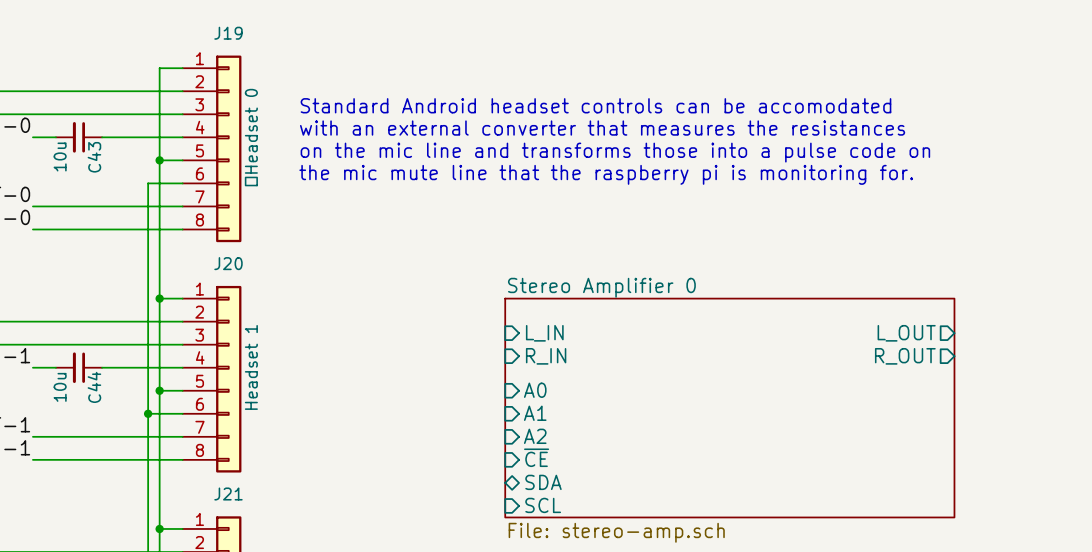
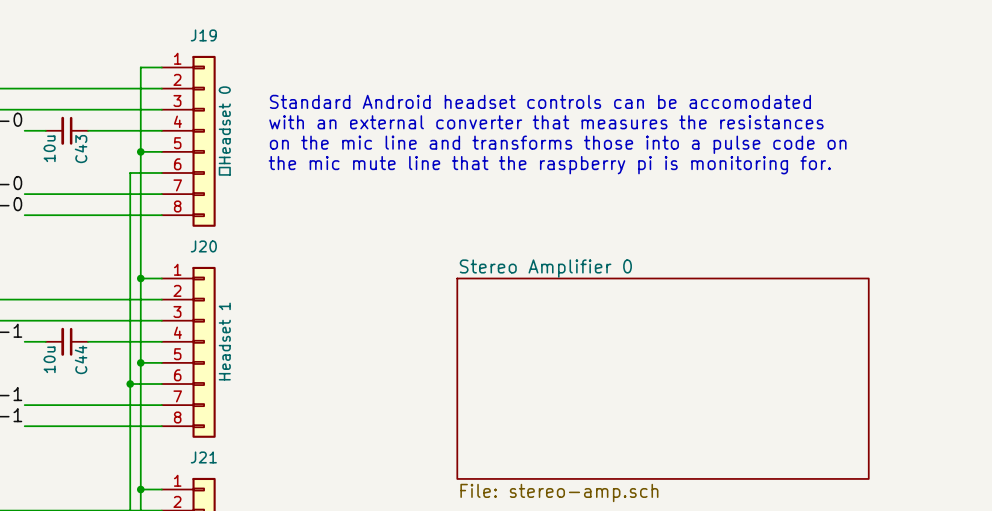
sheet pin: L_IN (544, 333) -> none
sheet pin: L_OUT (906, 333) -> none
sheet pin: R_IN (546, 356) -> none
sheet pin: R_OUT (905, 356) -> none
sheet pin: A0 (535, 390) -> none
sheet pin: A1 (535, 413) -> none
sheet pin: A2 (535, 436) -> none
sheet pin: ~{CE} (536, 457) -> none
sheet pin: SDA (543, 482) -> none
sheet pin: SCL (543, 505) -> none

